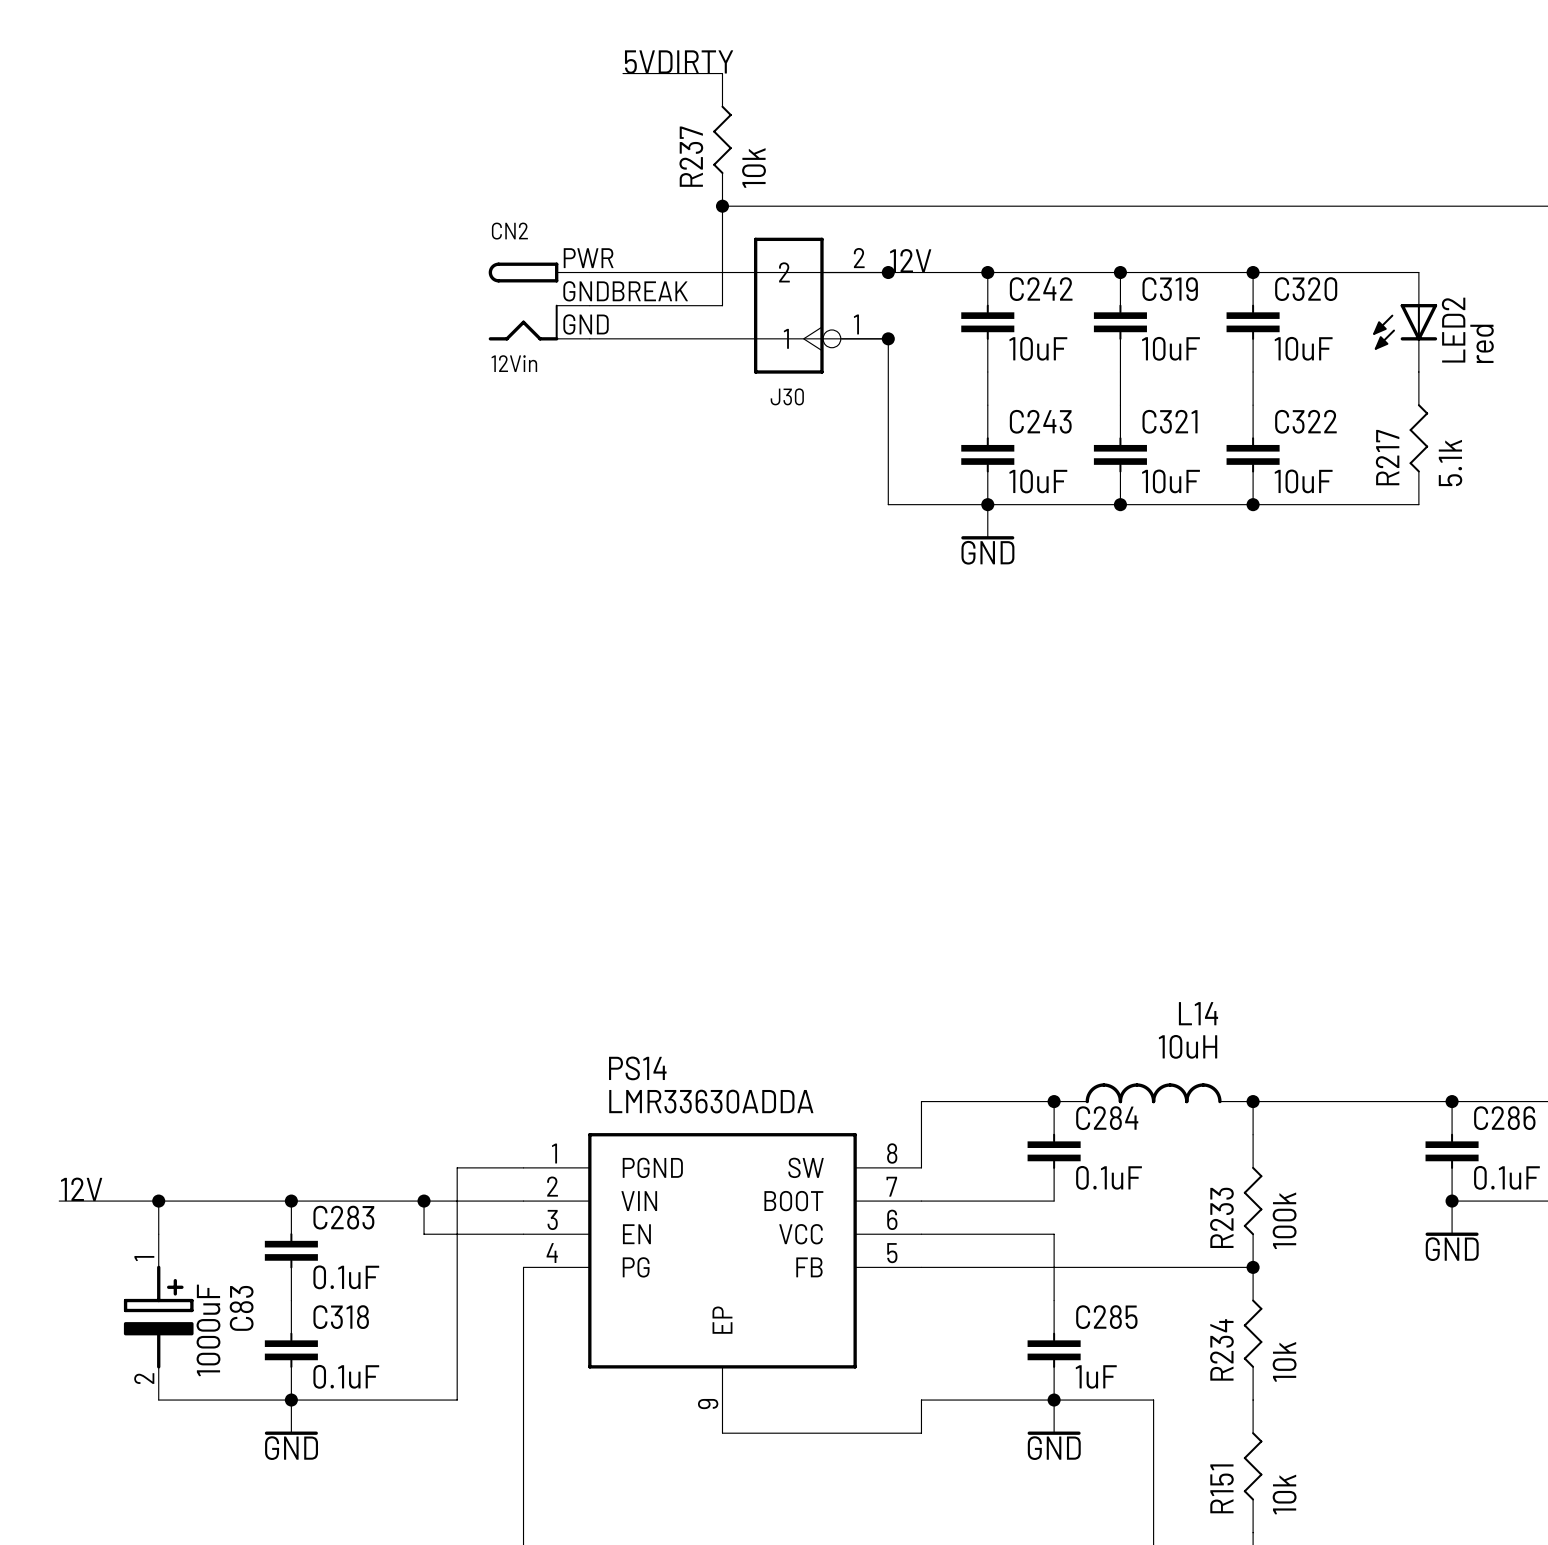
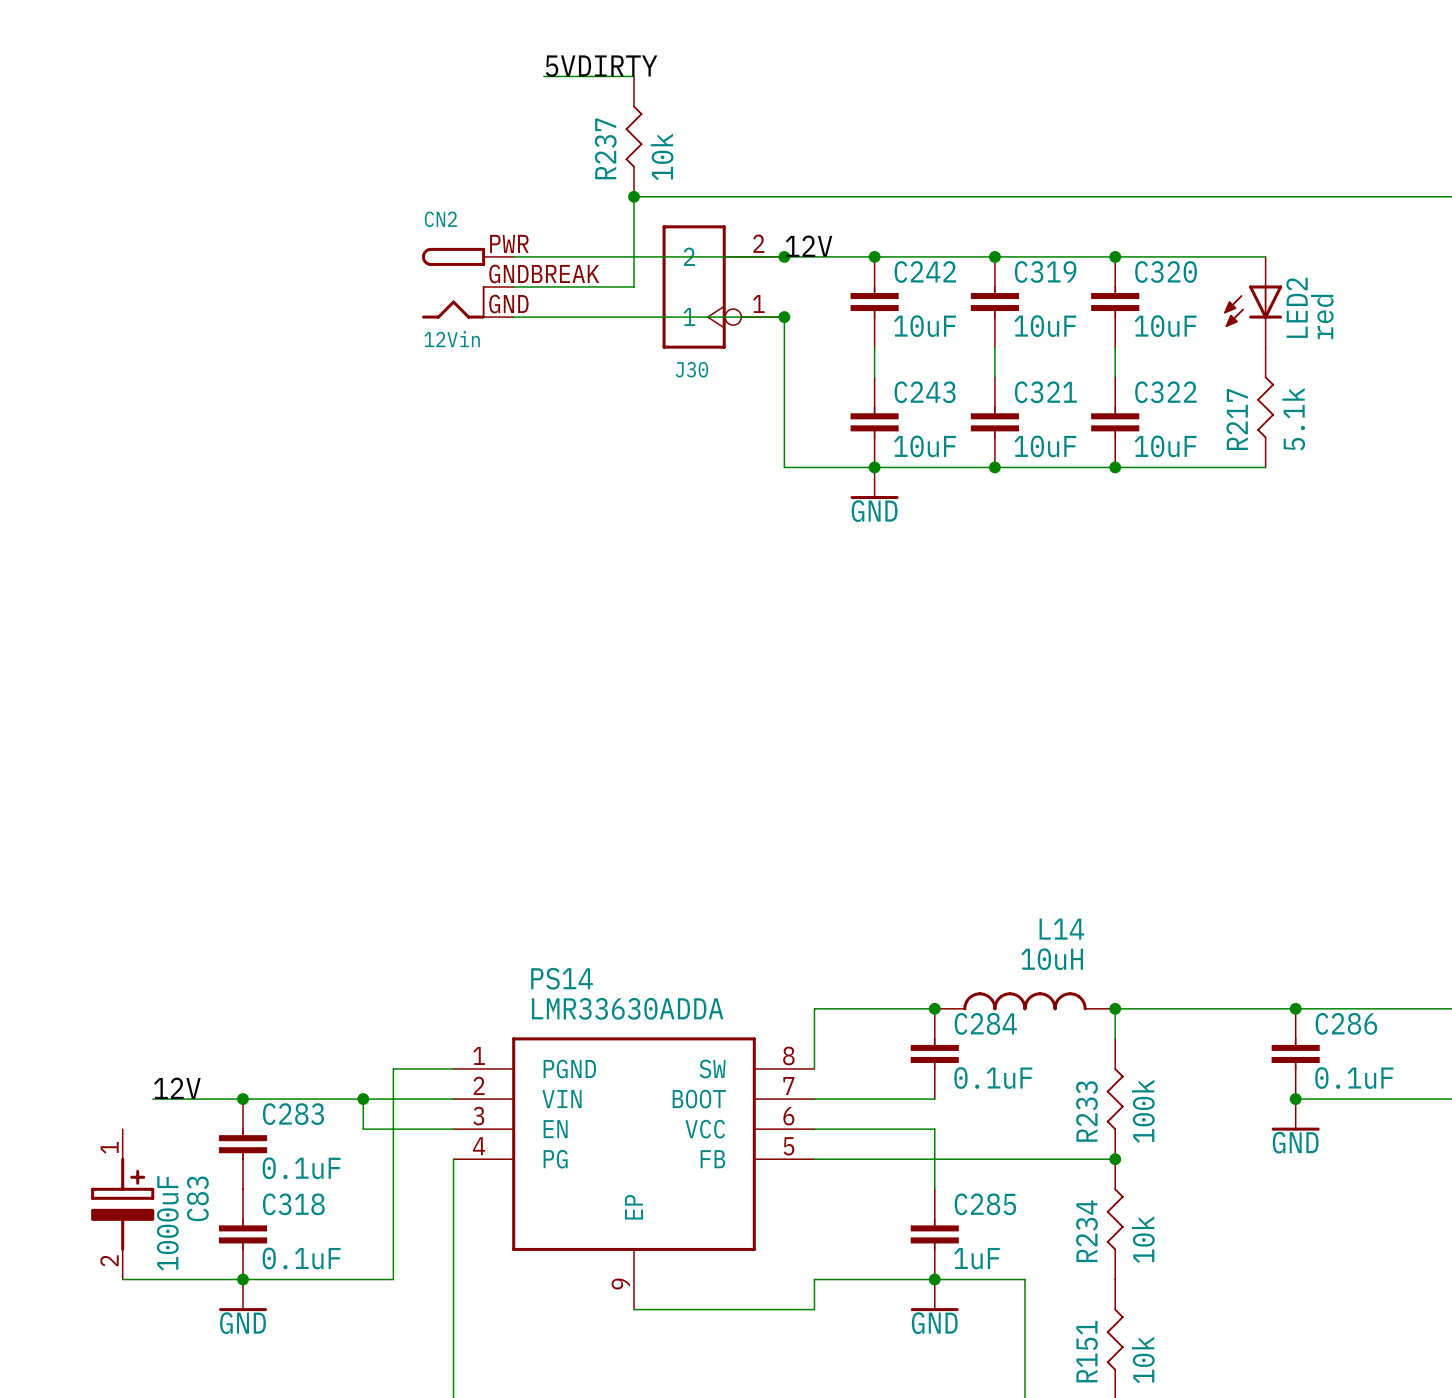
label position: 12V (81, 1189) -> 12V (177, 1088)
wire: (59, 1201) (191, 1201) -> none
wire: (158, 1201) (158, 1234) -> none
junction: (158, 1201) -> none

